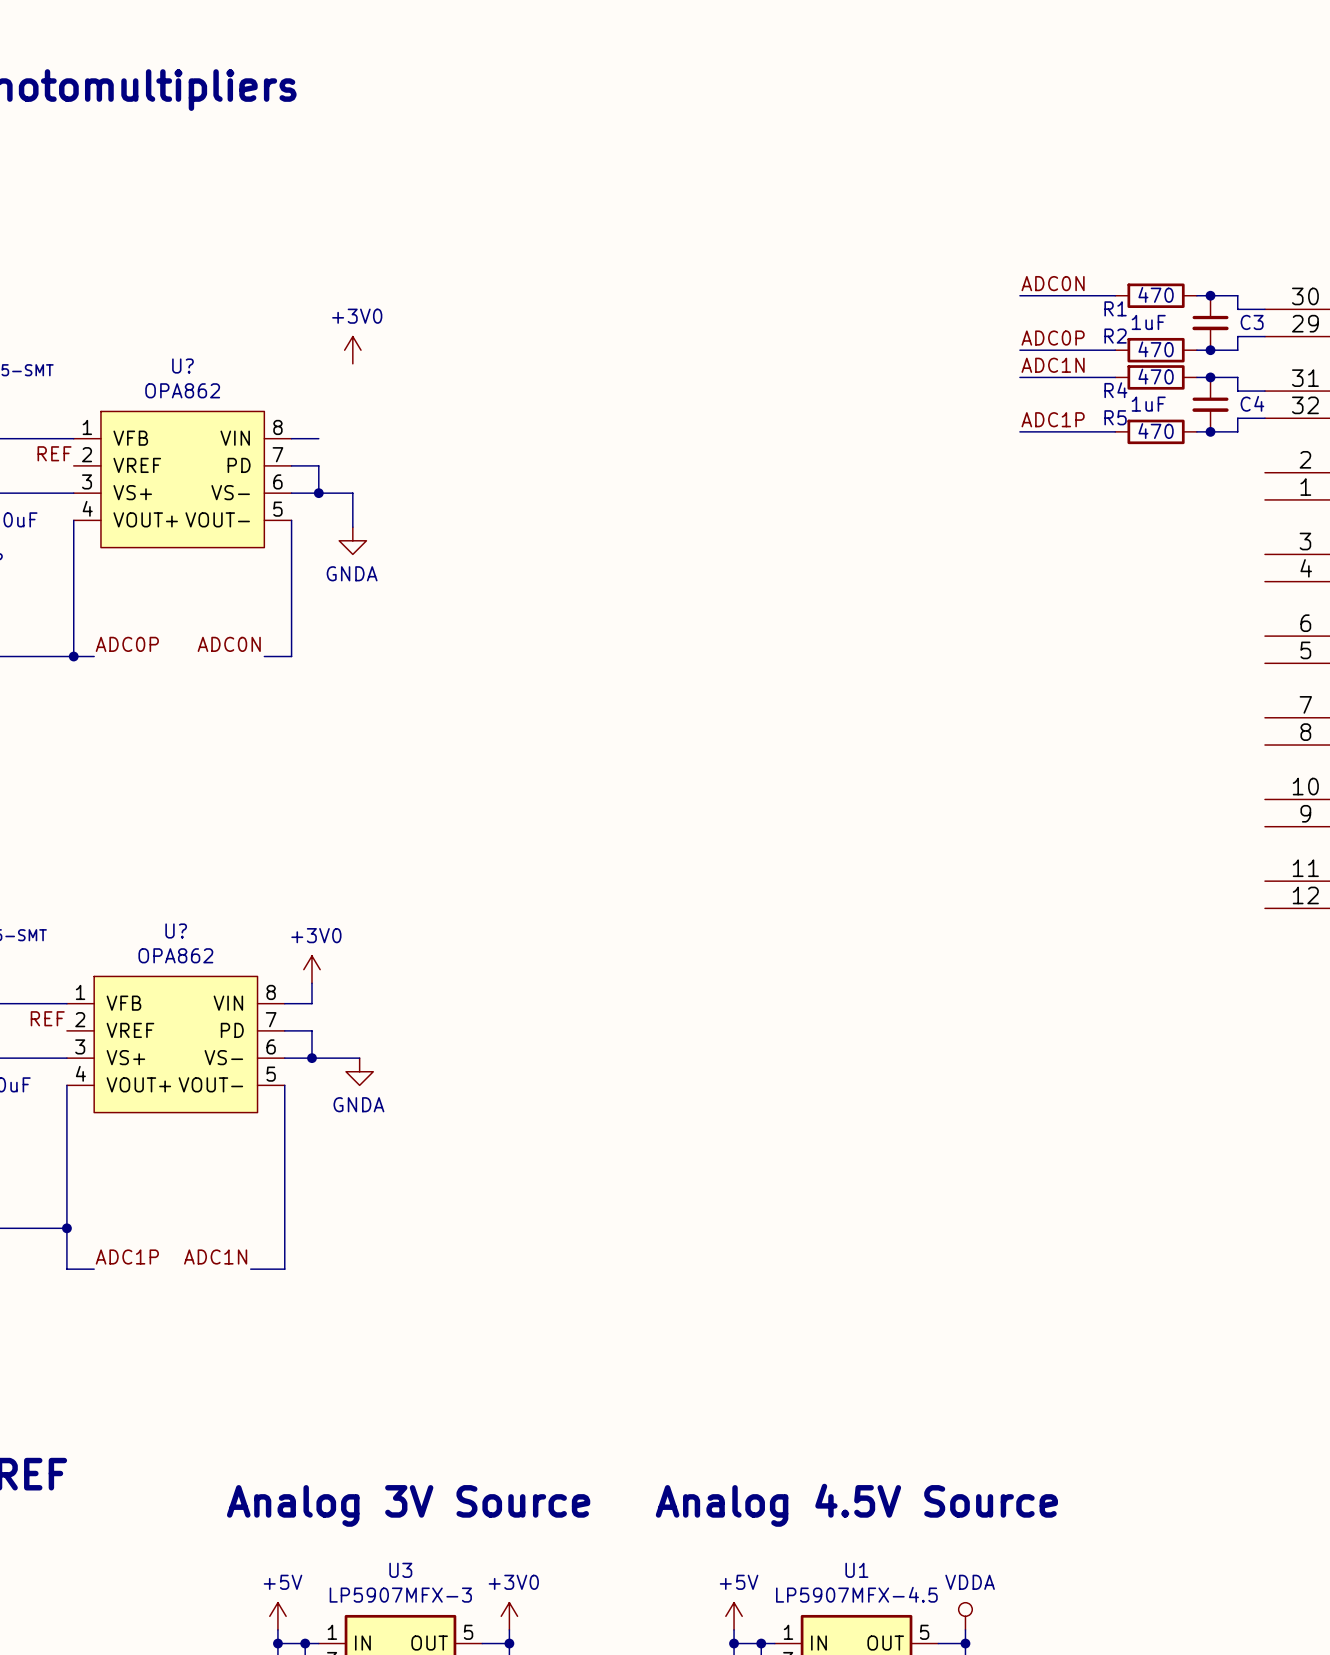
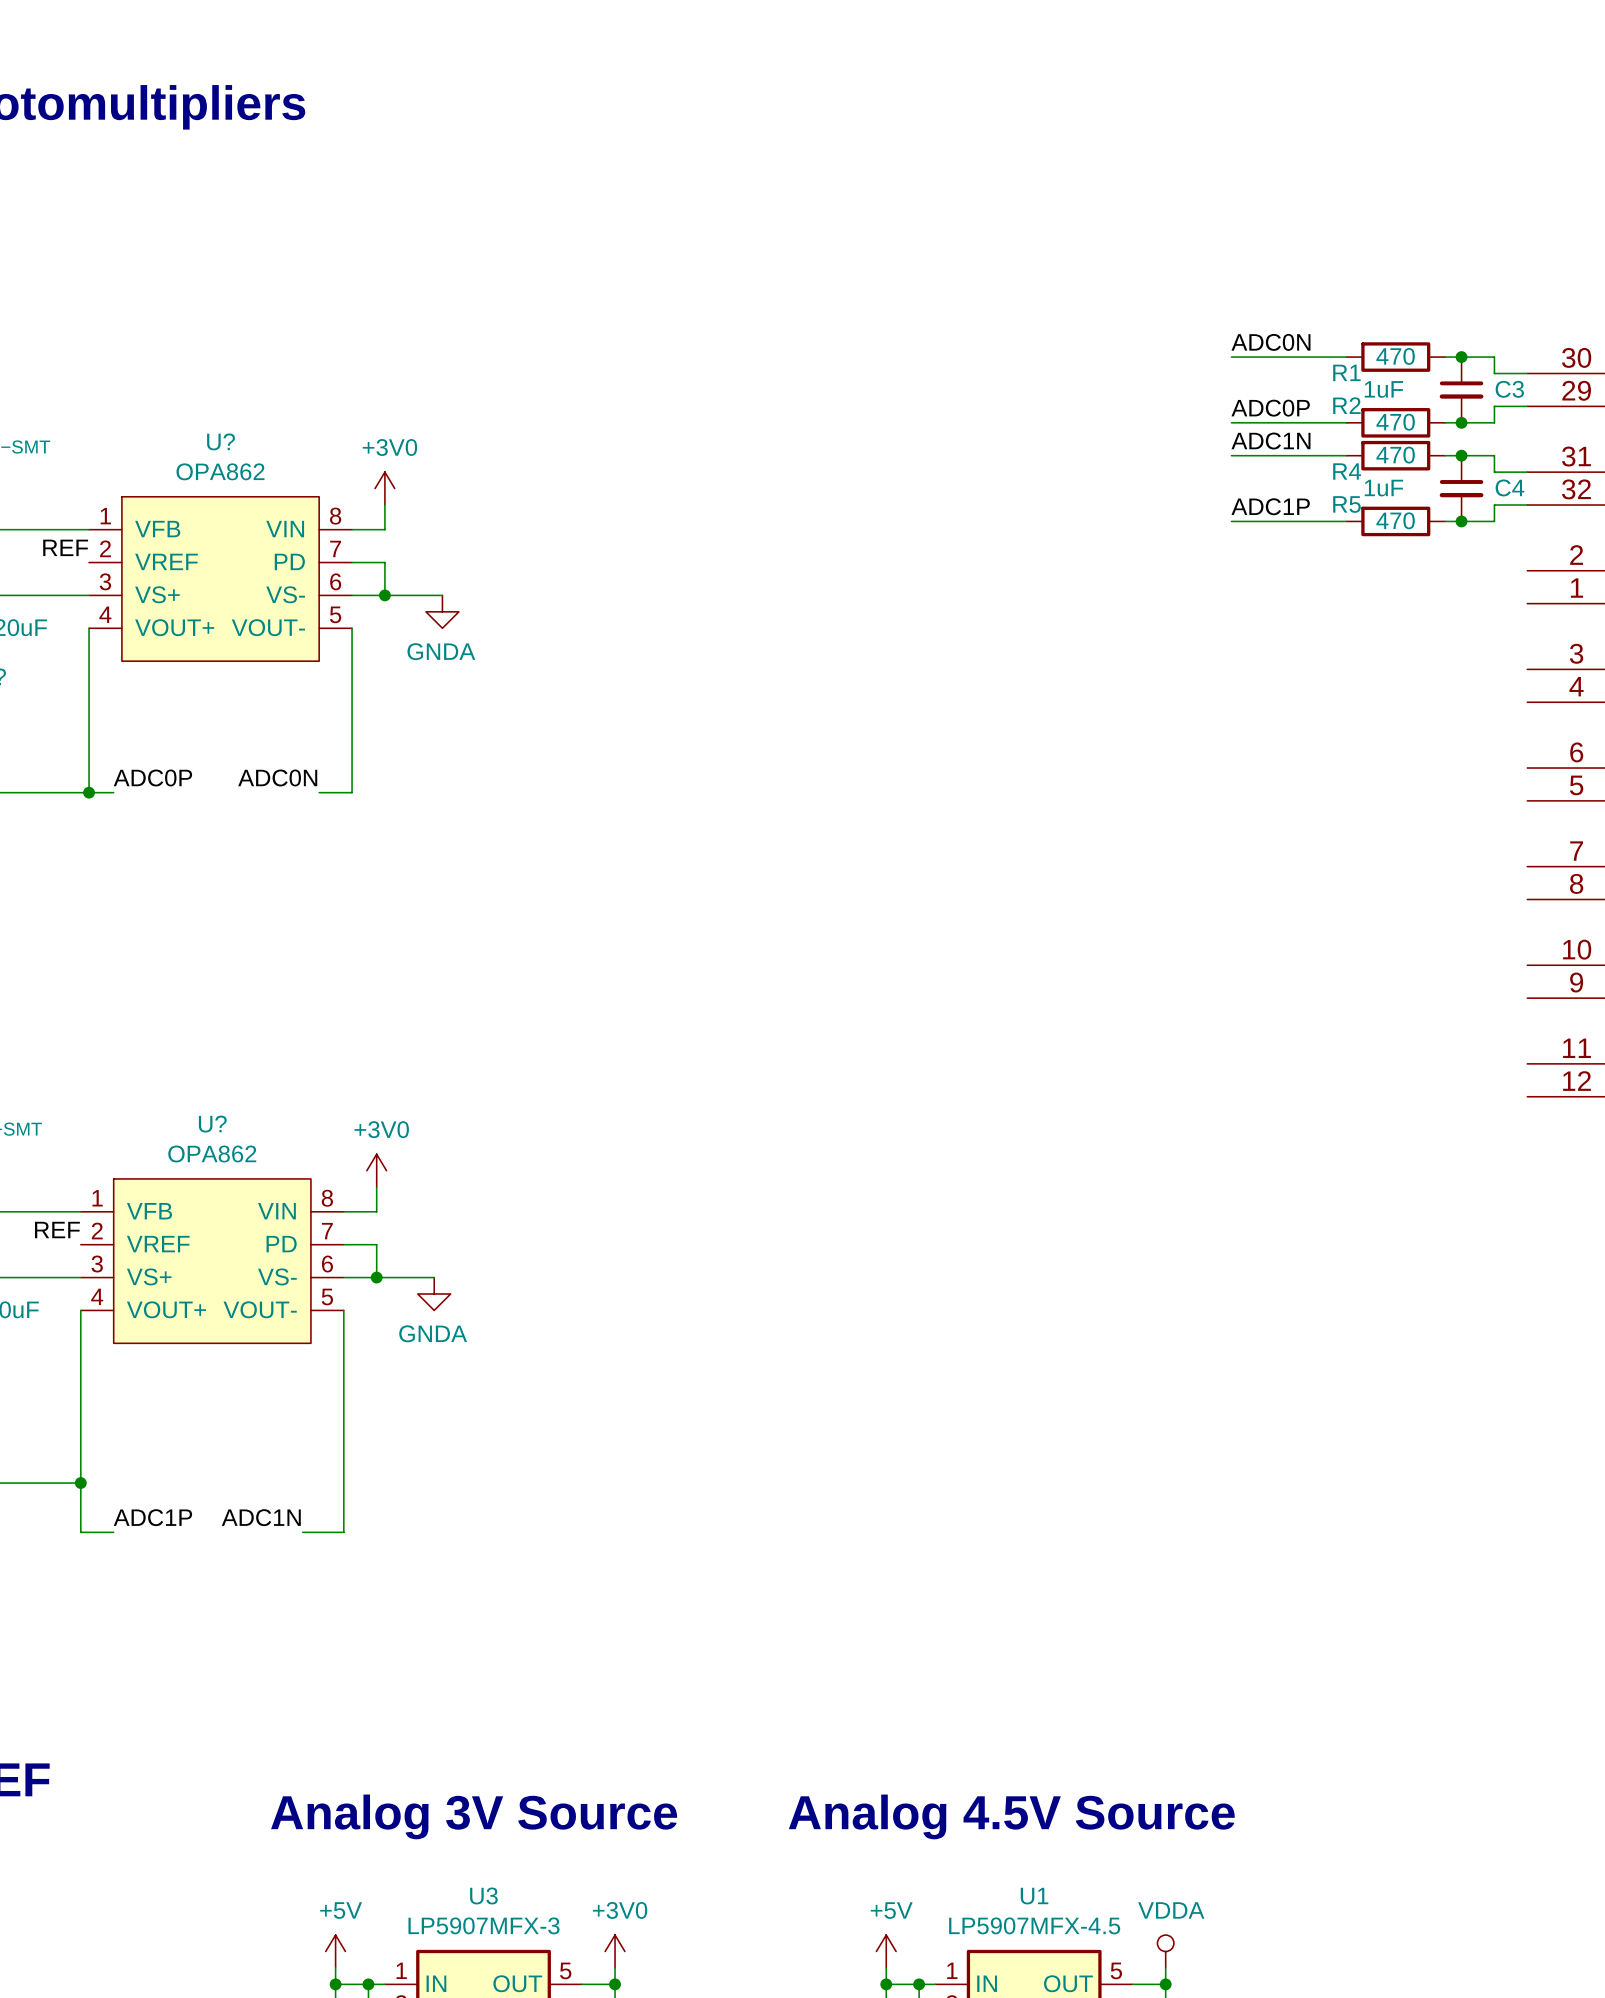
power symbol position: +3V0 (352, 350) -> +3V0 (384, 488)
wire: none -> (384, 505) (384, 529)
wire: (352, 493) (352, 527) -> (426, 595) (442, 595)
power symbol position: GNDA (352, 540) -> GNDA (442, 611)

